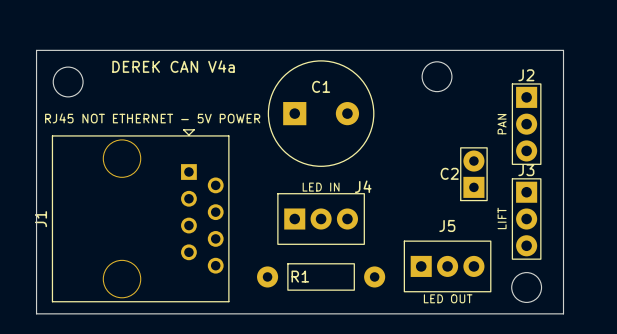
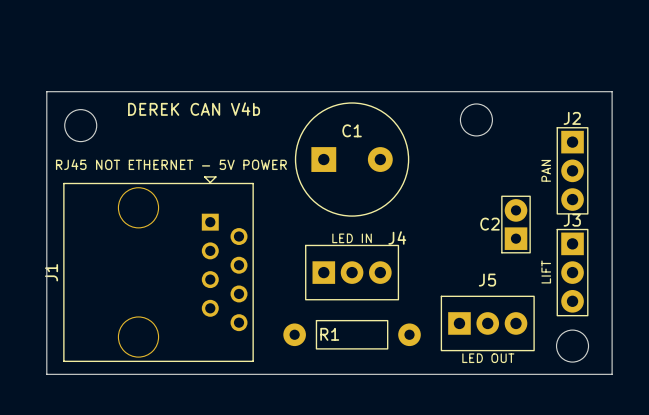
text: DEREK CAN V4a (173, 66) -> DEREK CAN V4b (194, 109)

